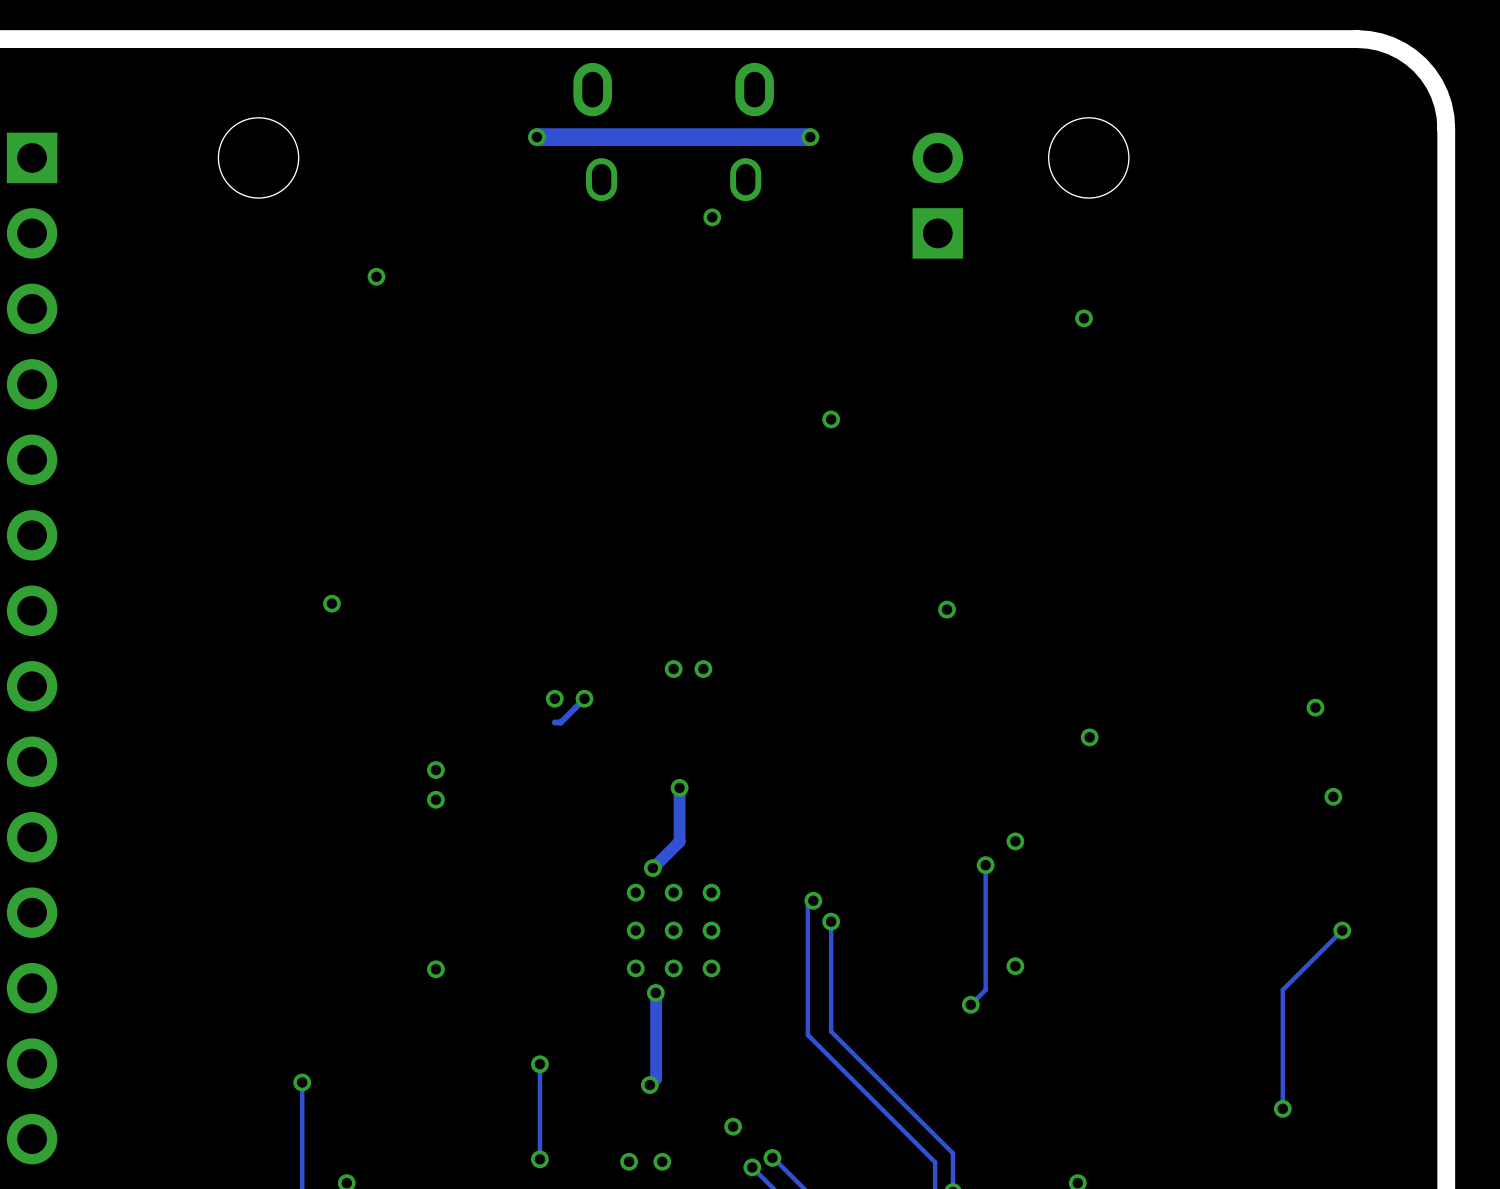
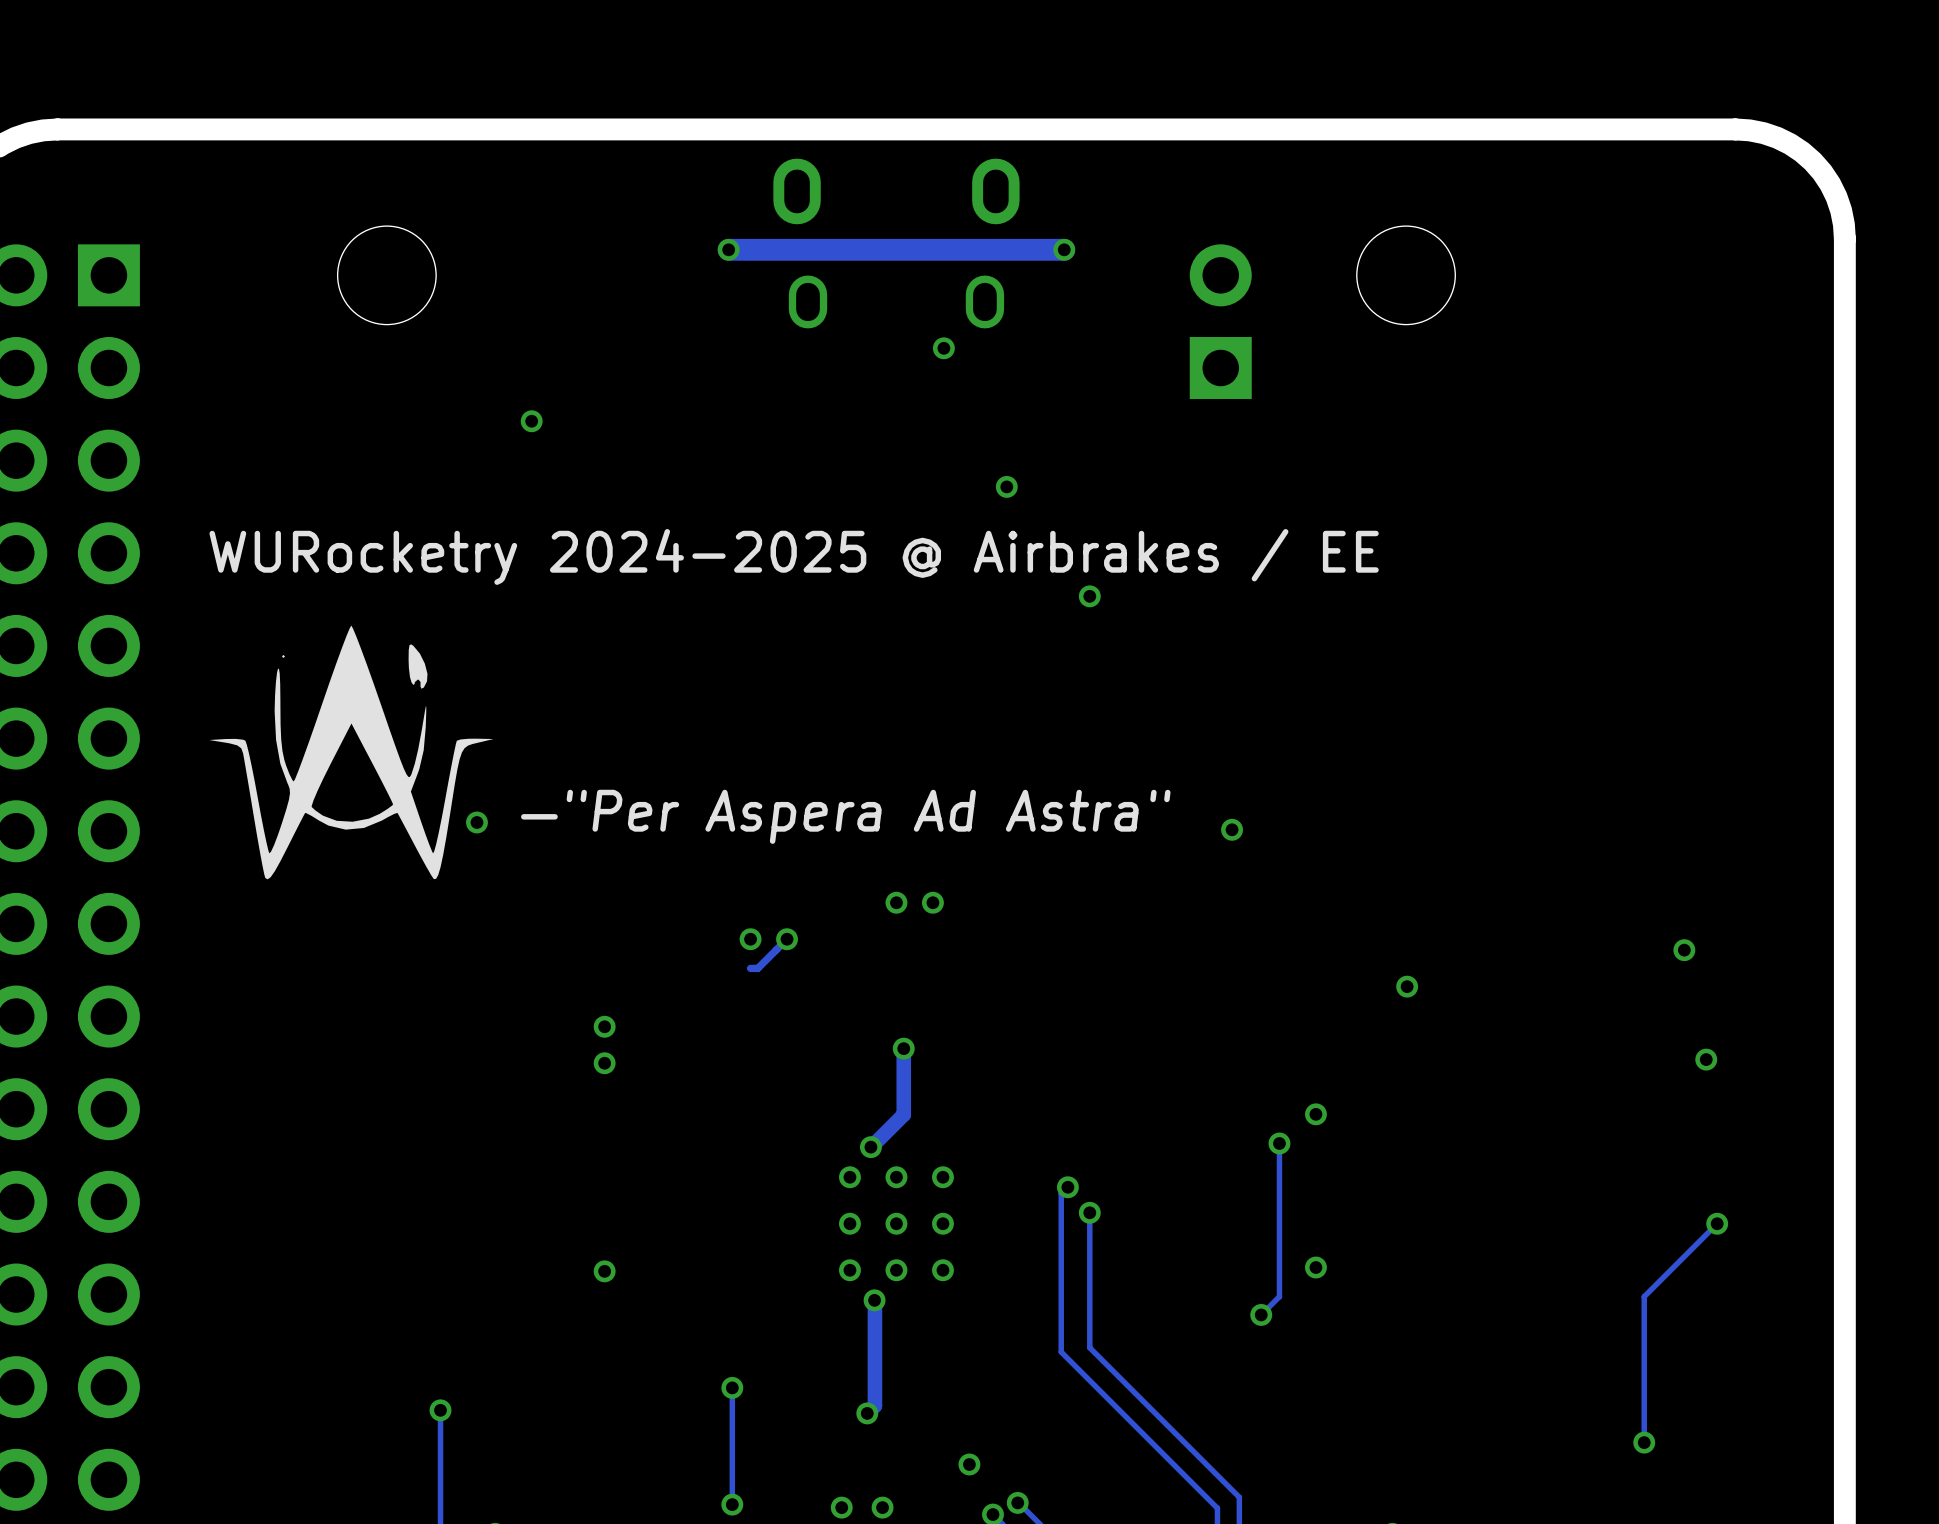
via: (1084, 318) -> none
via: none -> (1006, 486)
text: none -> WURocketry 2024-2025 @ Airbrakes / EE (794, 556)
drawing: none -> [209, 625, 494, 880]
text: none -> —"Per Aspera Ad Astra" (845, 816)

